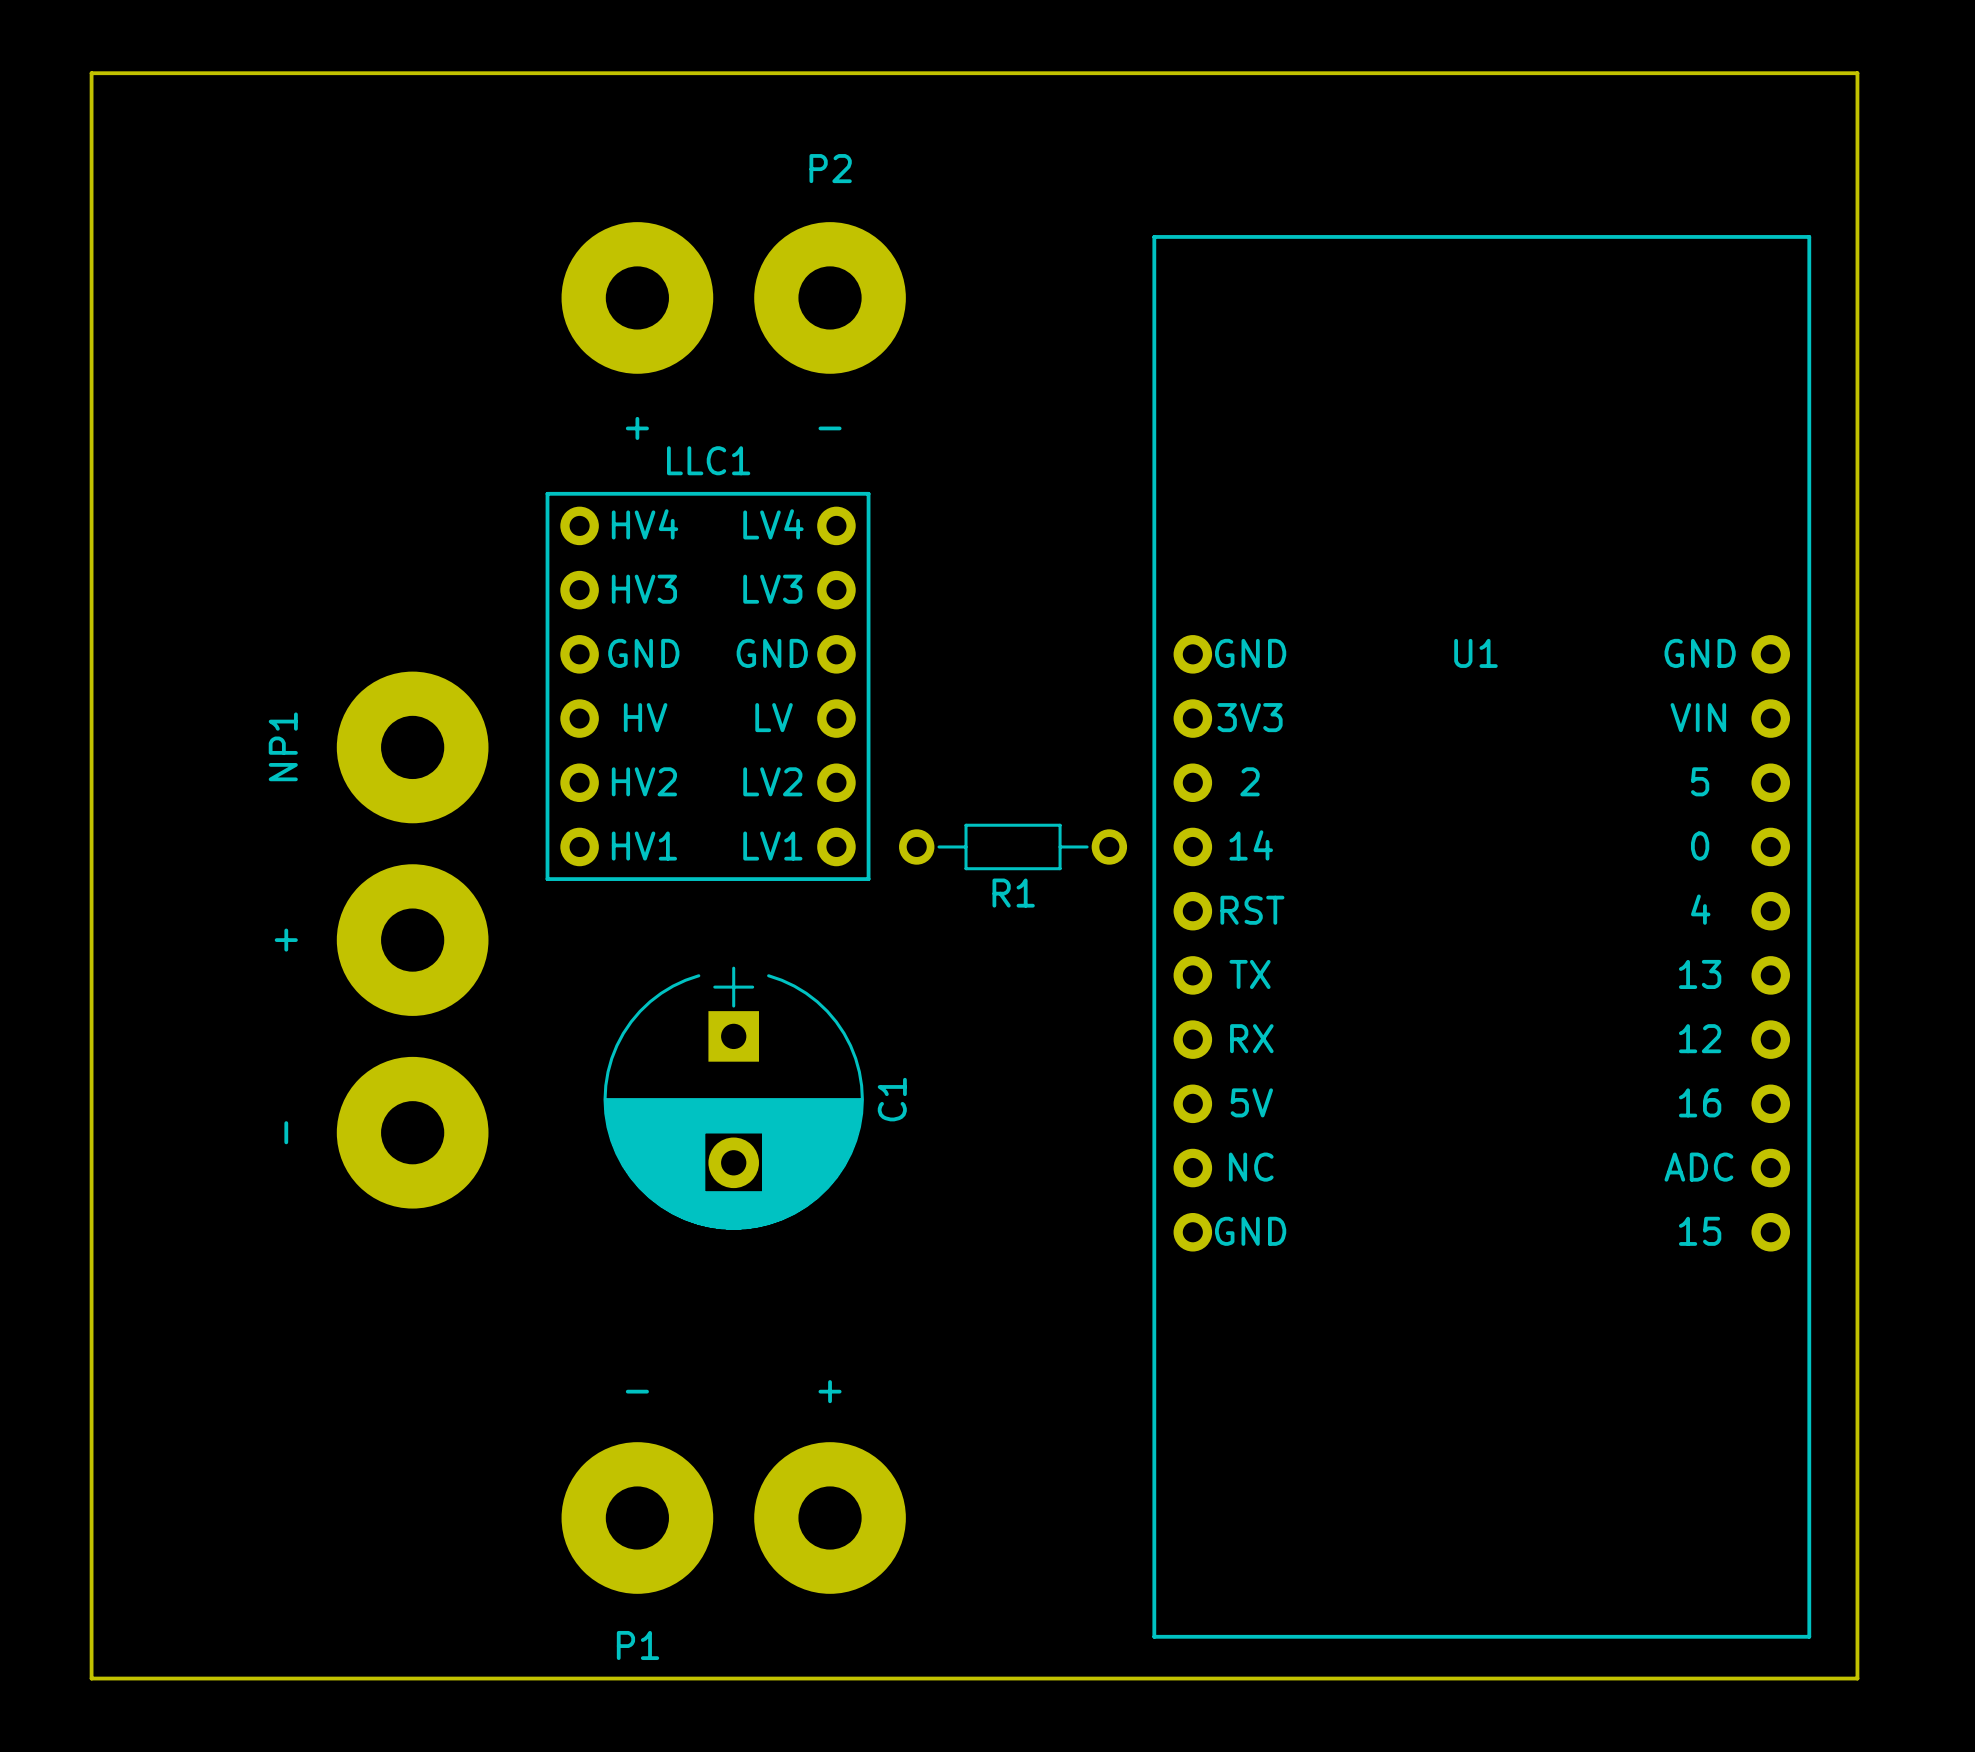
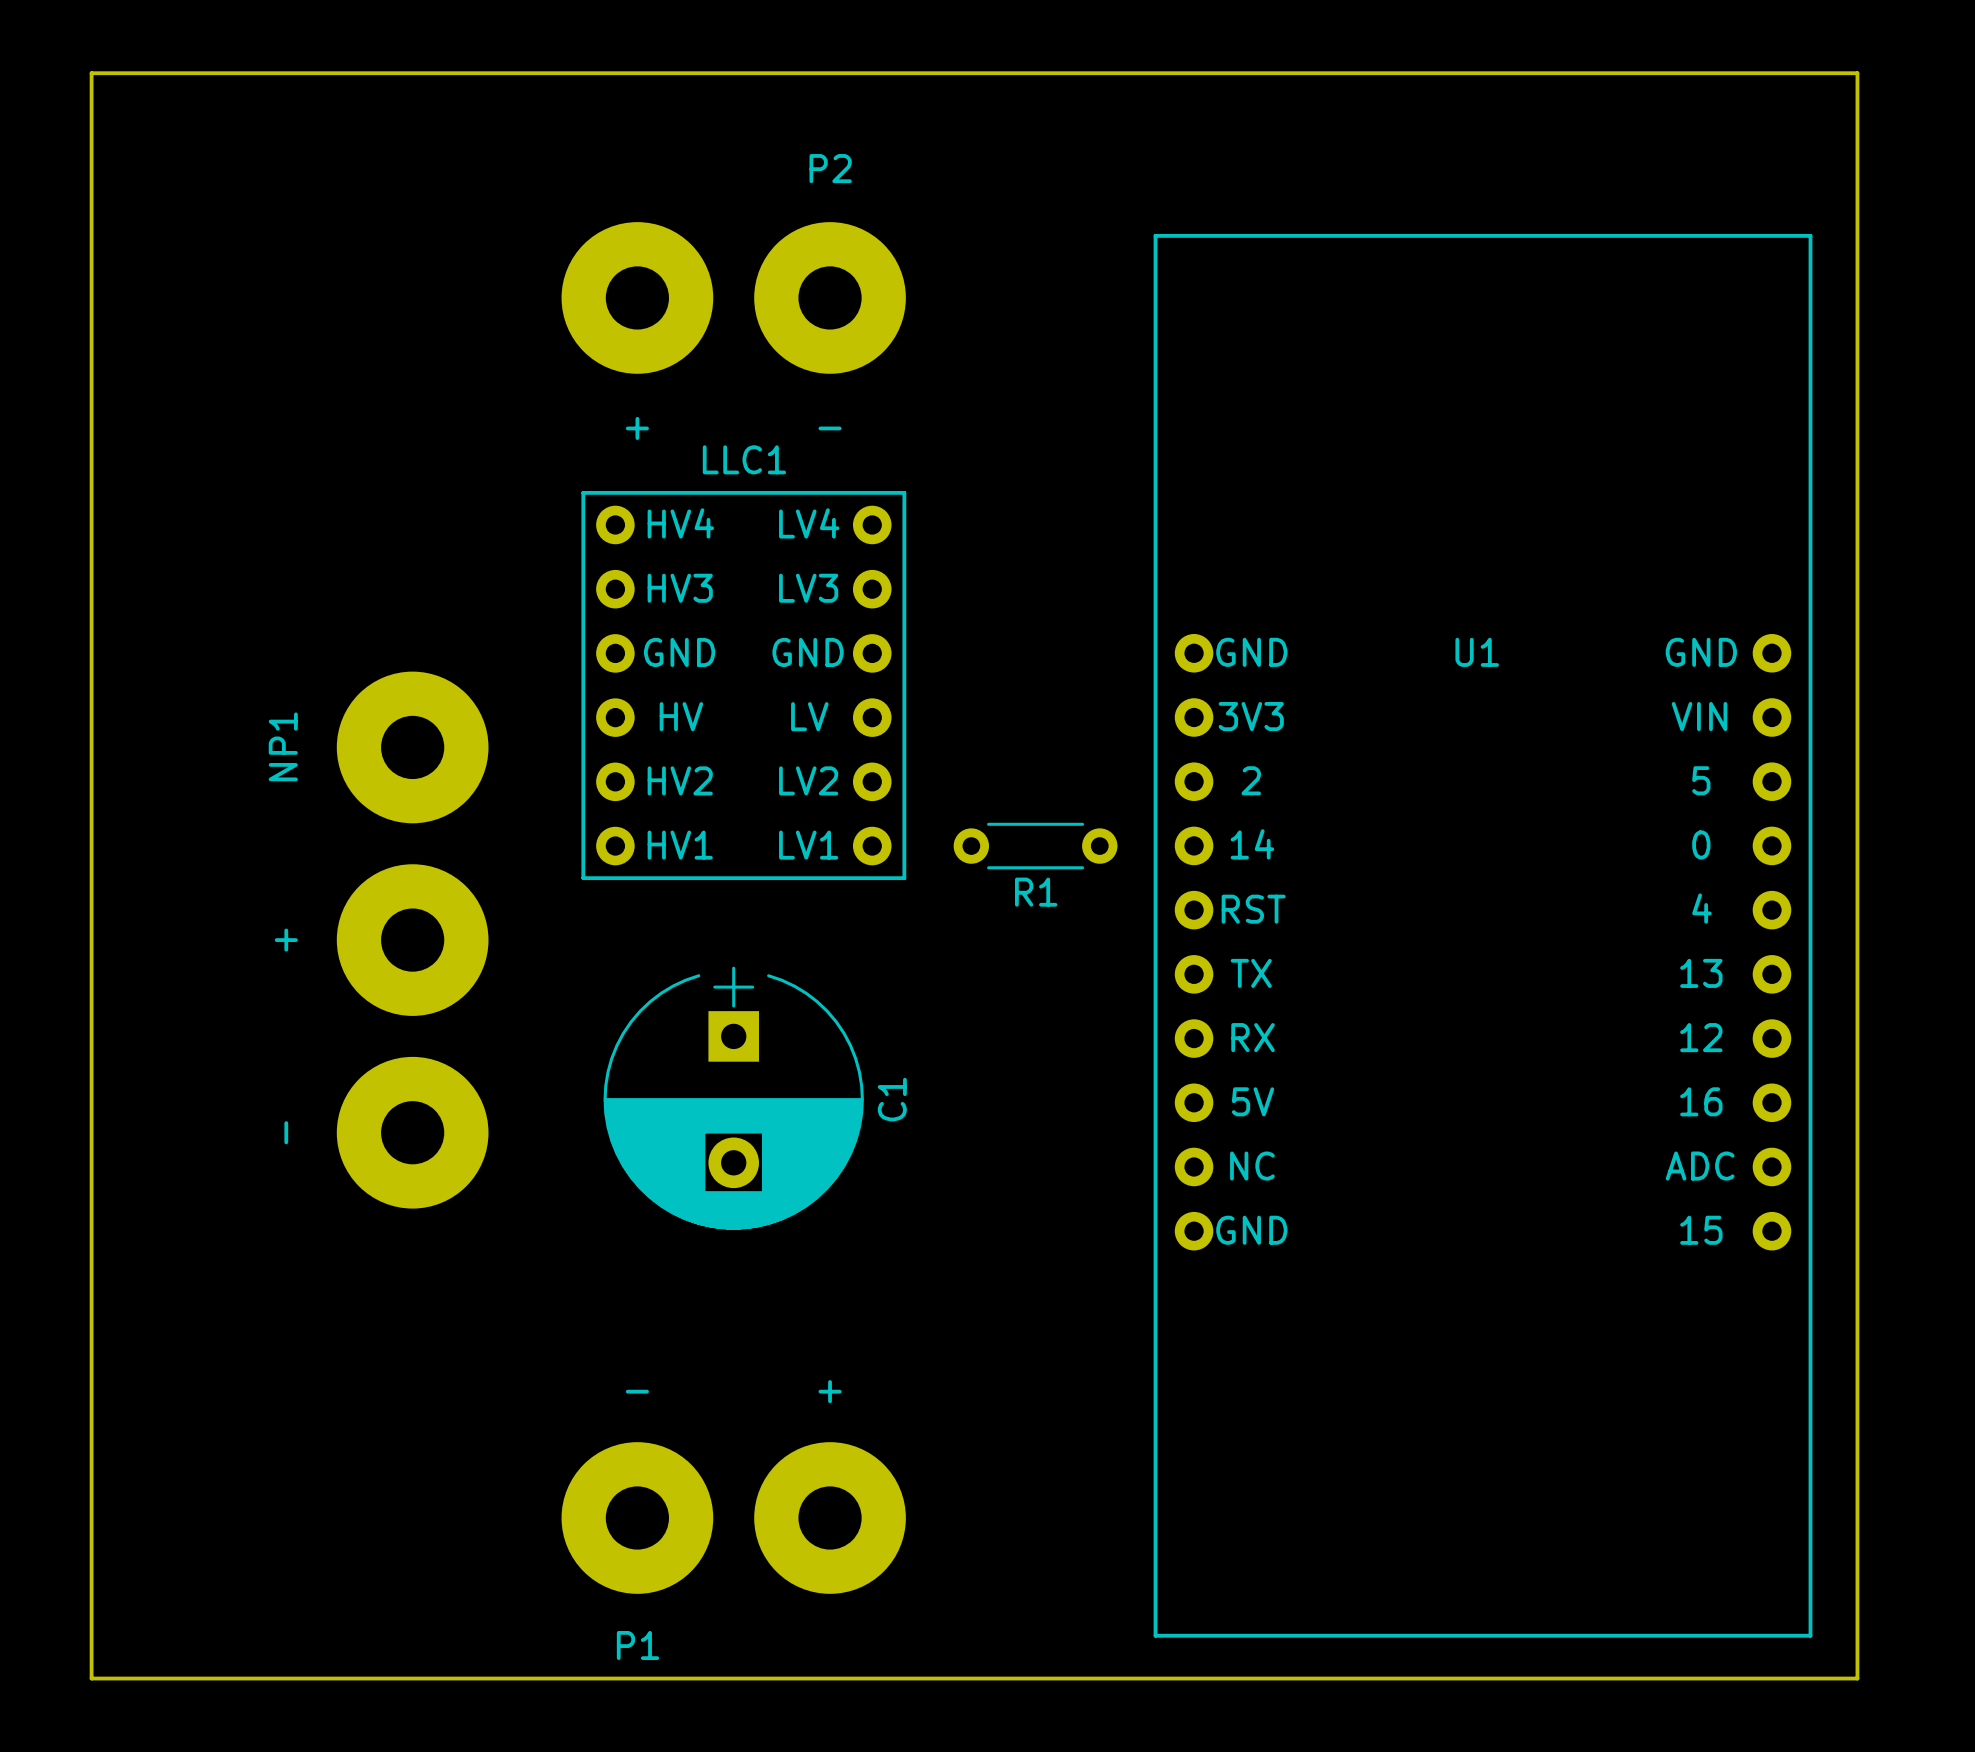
U1 footprint: [1152, 235, 1812, 1639] -> [1153, 233, 1813, 1638]
LLC1 footprint: [545, 491, 871, 881] -> [581, 490, 907, 881]
R1 footprint: [899, 823, 1128, 871] -> [953, 822, 1118, 870]

